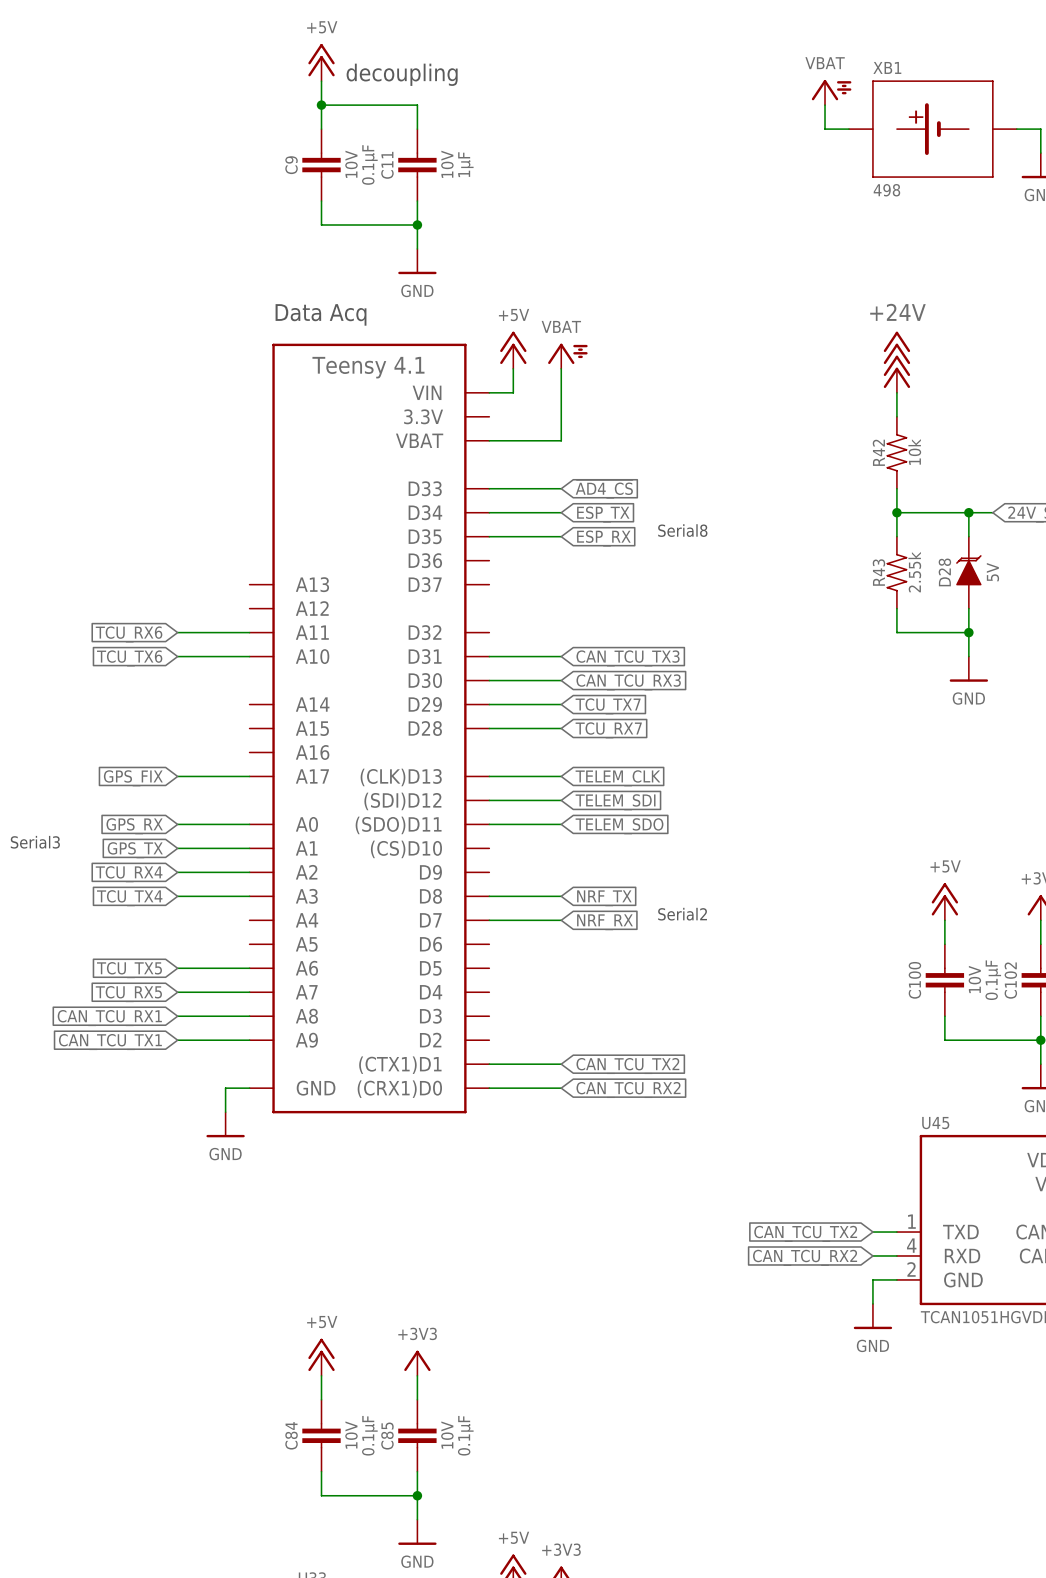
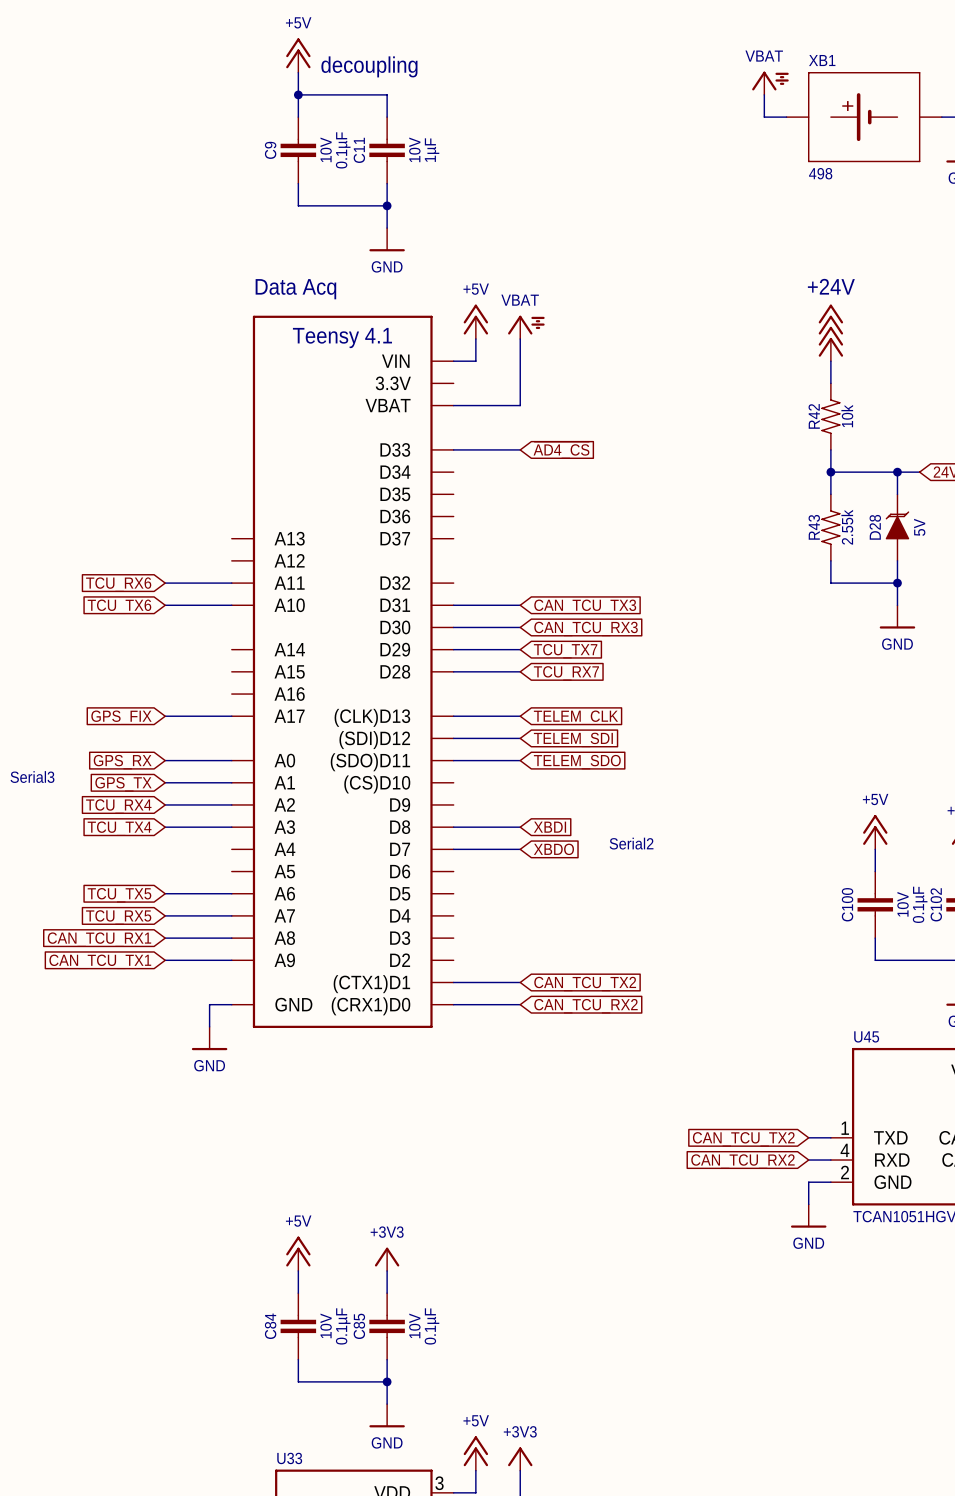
wire: (489, 512) (561, 512) -> none
global label: ESP_TX (603, 514) -> none
text: Serial8 (682, 530) -> none
wire: (489, 536) (561, 536) -> none
global label: ESP_RX (603, 538) -> none
global label: NRF_TX (604, 898) -> XBDI (549, 827)
global label: NRF_RX (604, 922) -> XBDO (553, 849)

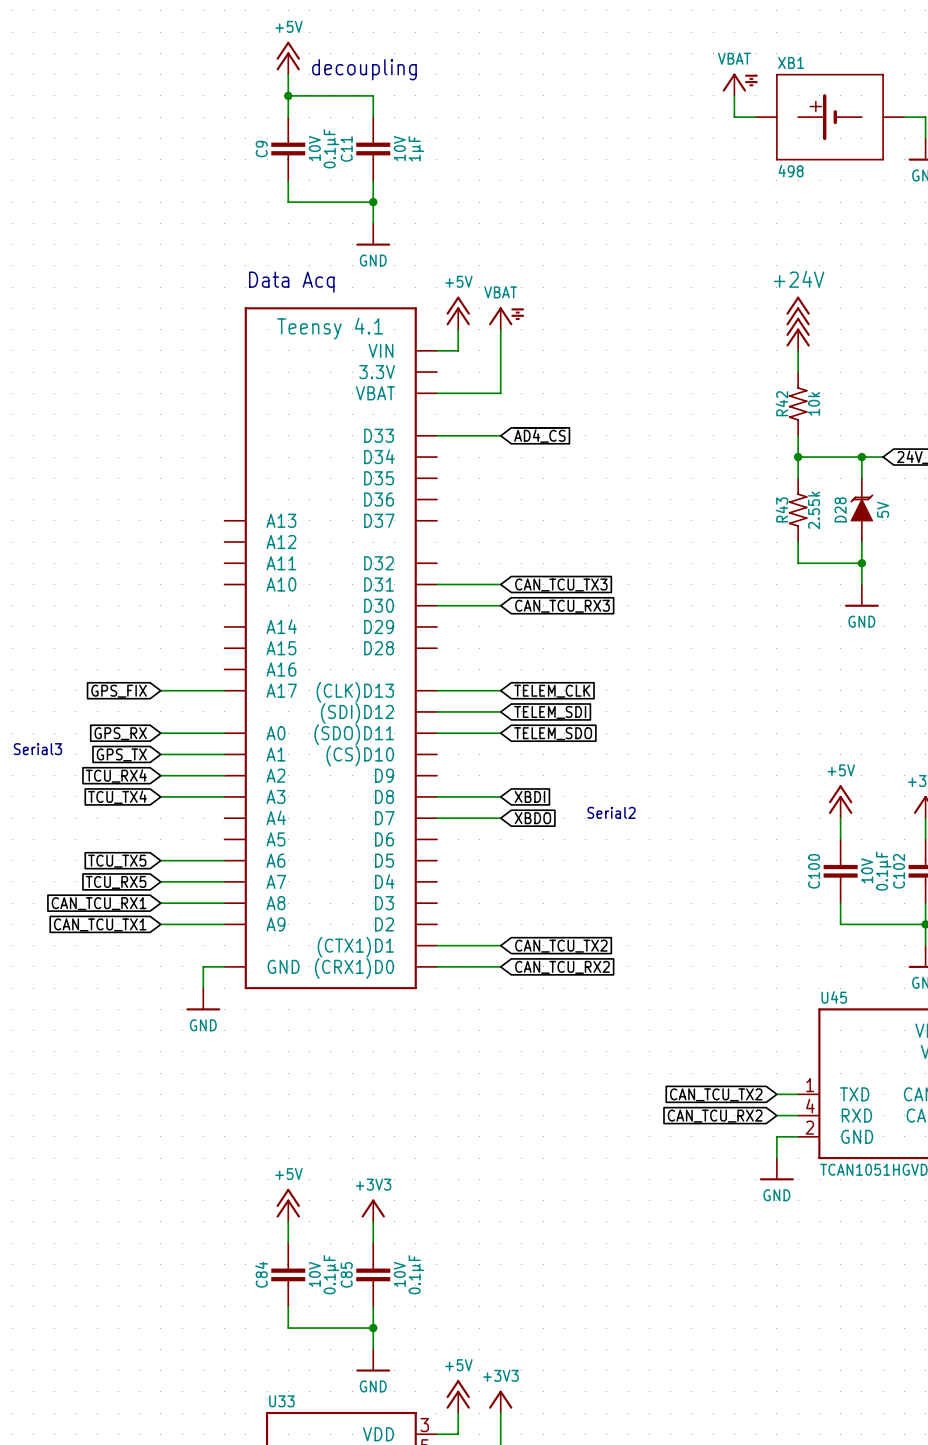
wire: (165, 583) (231, 583) -> none
global label: TCU_RX6 (118, 584) -> none
wire: (165, 605) (231, 605) -> none
global label: TCU_TX6 (119, 606) -> none
wire: (453, 649) (520, 649) -> none
global label: TCU_TX7 (565, 651) -> none
wire: (453, 671) (520, 671) -> none
global label: TCU_RX7 (566, 673) -> none

